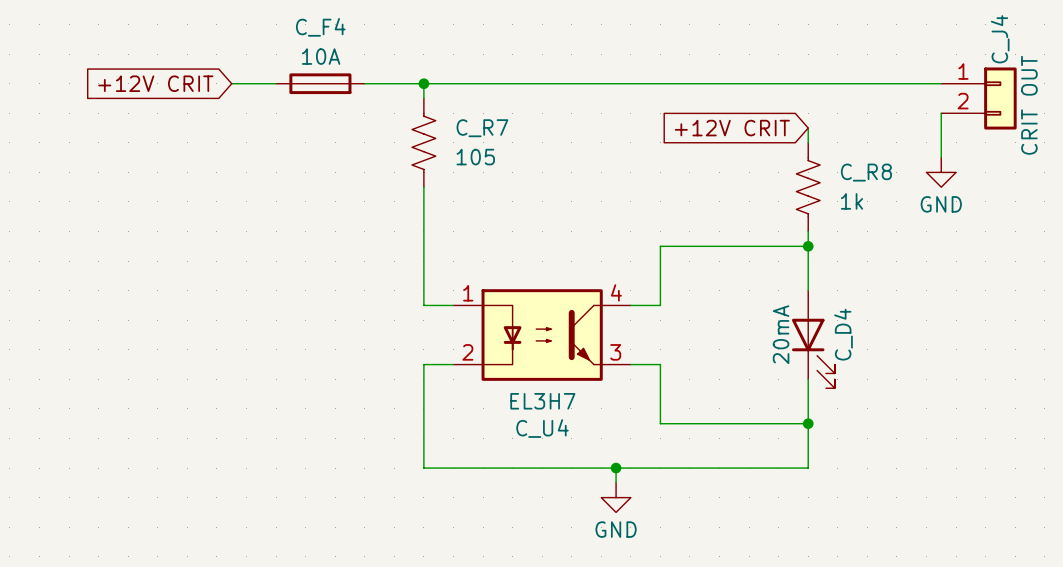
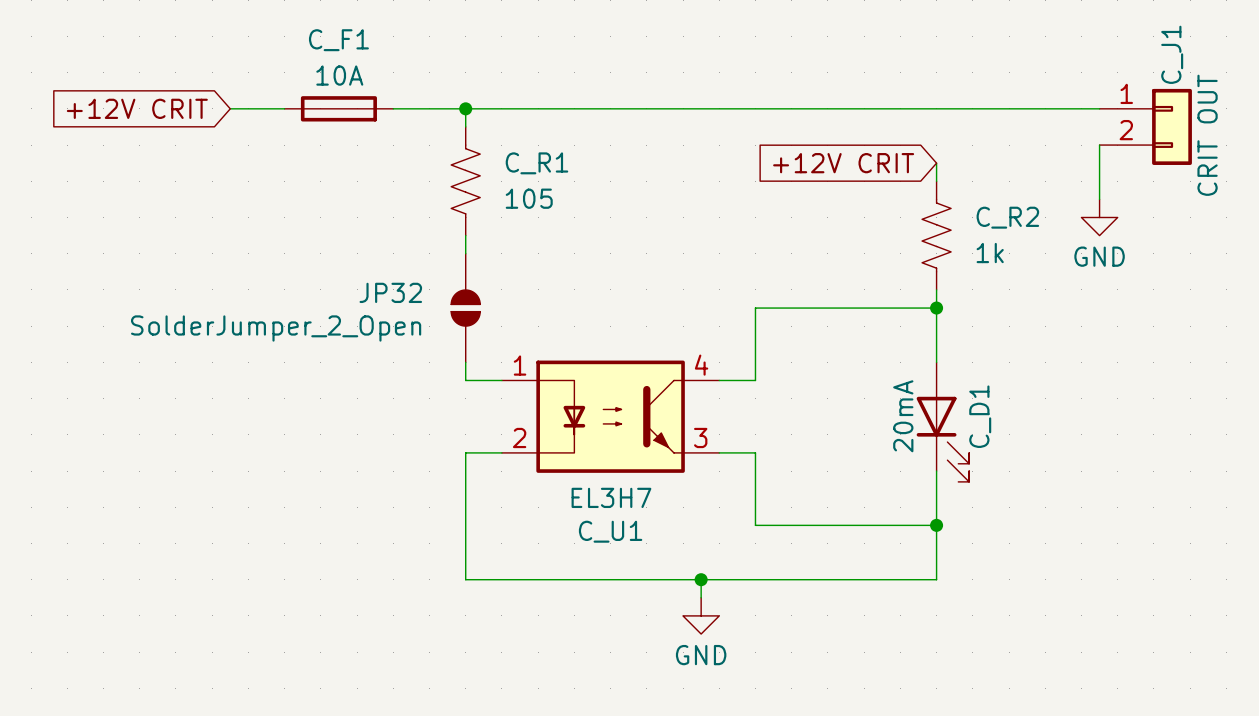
C_F4 name: C_F4 (320, 27) -> C_F1 (338, 40)
C_J4 name: C_J4 (1000, 39) -> C_J1 (1172, 54)
C_R7 name: C_R7 (482, 128) -> C_R1 (536, 163)
C_R8 name: C_R8 (866, 172) -> C_R2 (1007, 217)
JP32: none -> SolderJumper_2_Open (465, 308)
C_D4 name: C_D4 (843, 334) -> C_D1 (980, 416)
C_U4 name: C_U4 (542, 428) -> C_U1 (610, 531)

